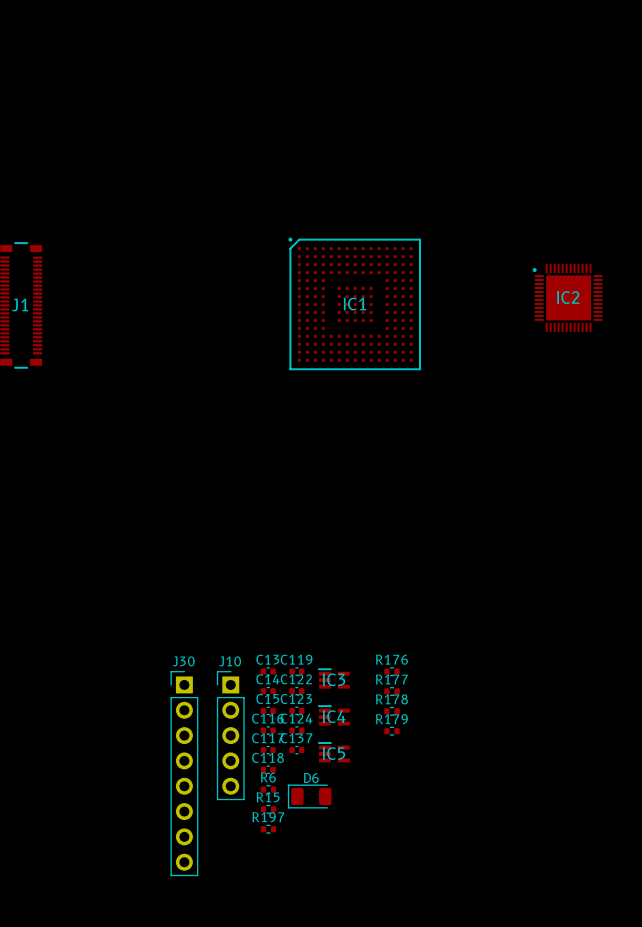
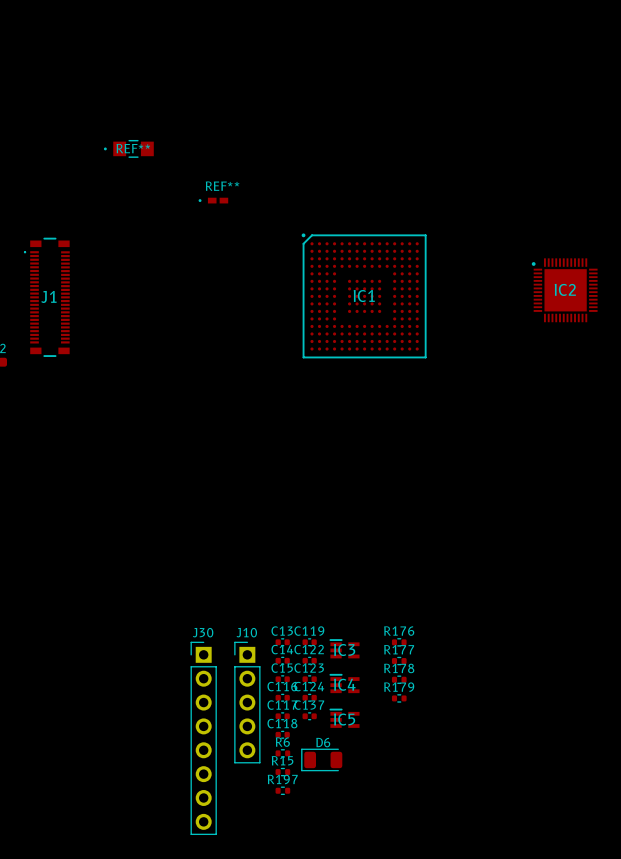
REF**: none -> (128, 148)
REF**: none -> (213, 200)

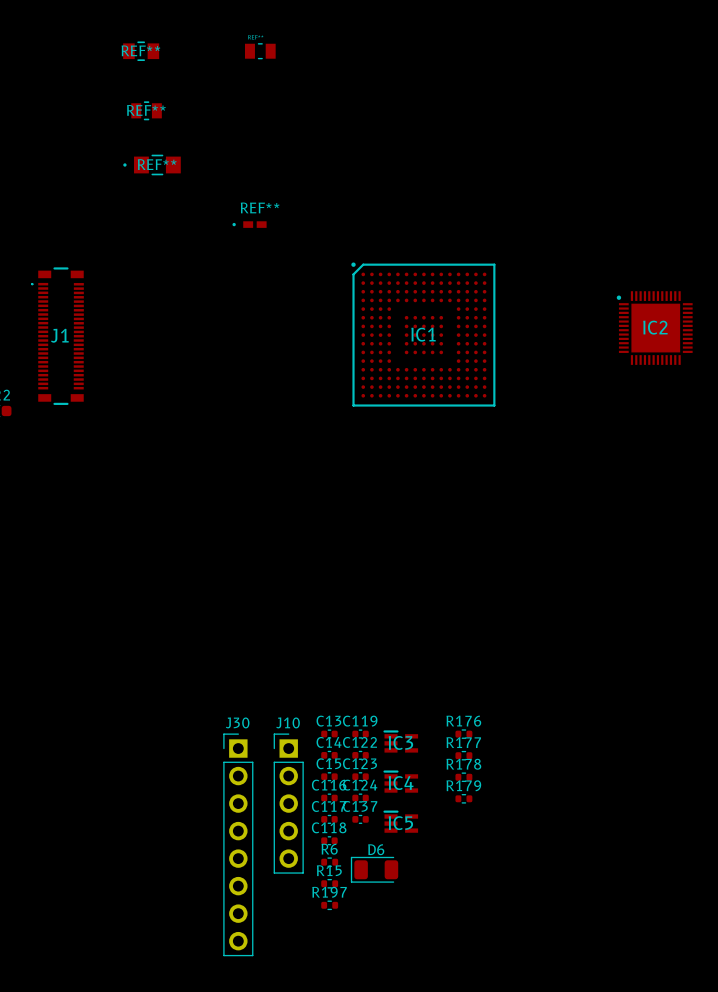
REF**: none -> (141, 51)
part: none -> (260, 51)
REF**: none -> (146, 110)

